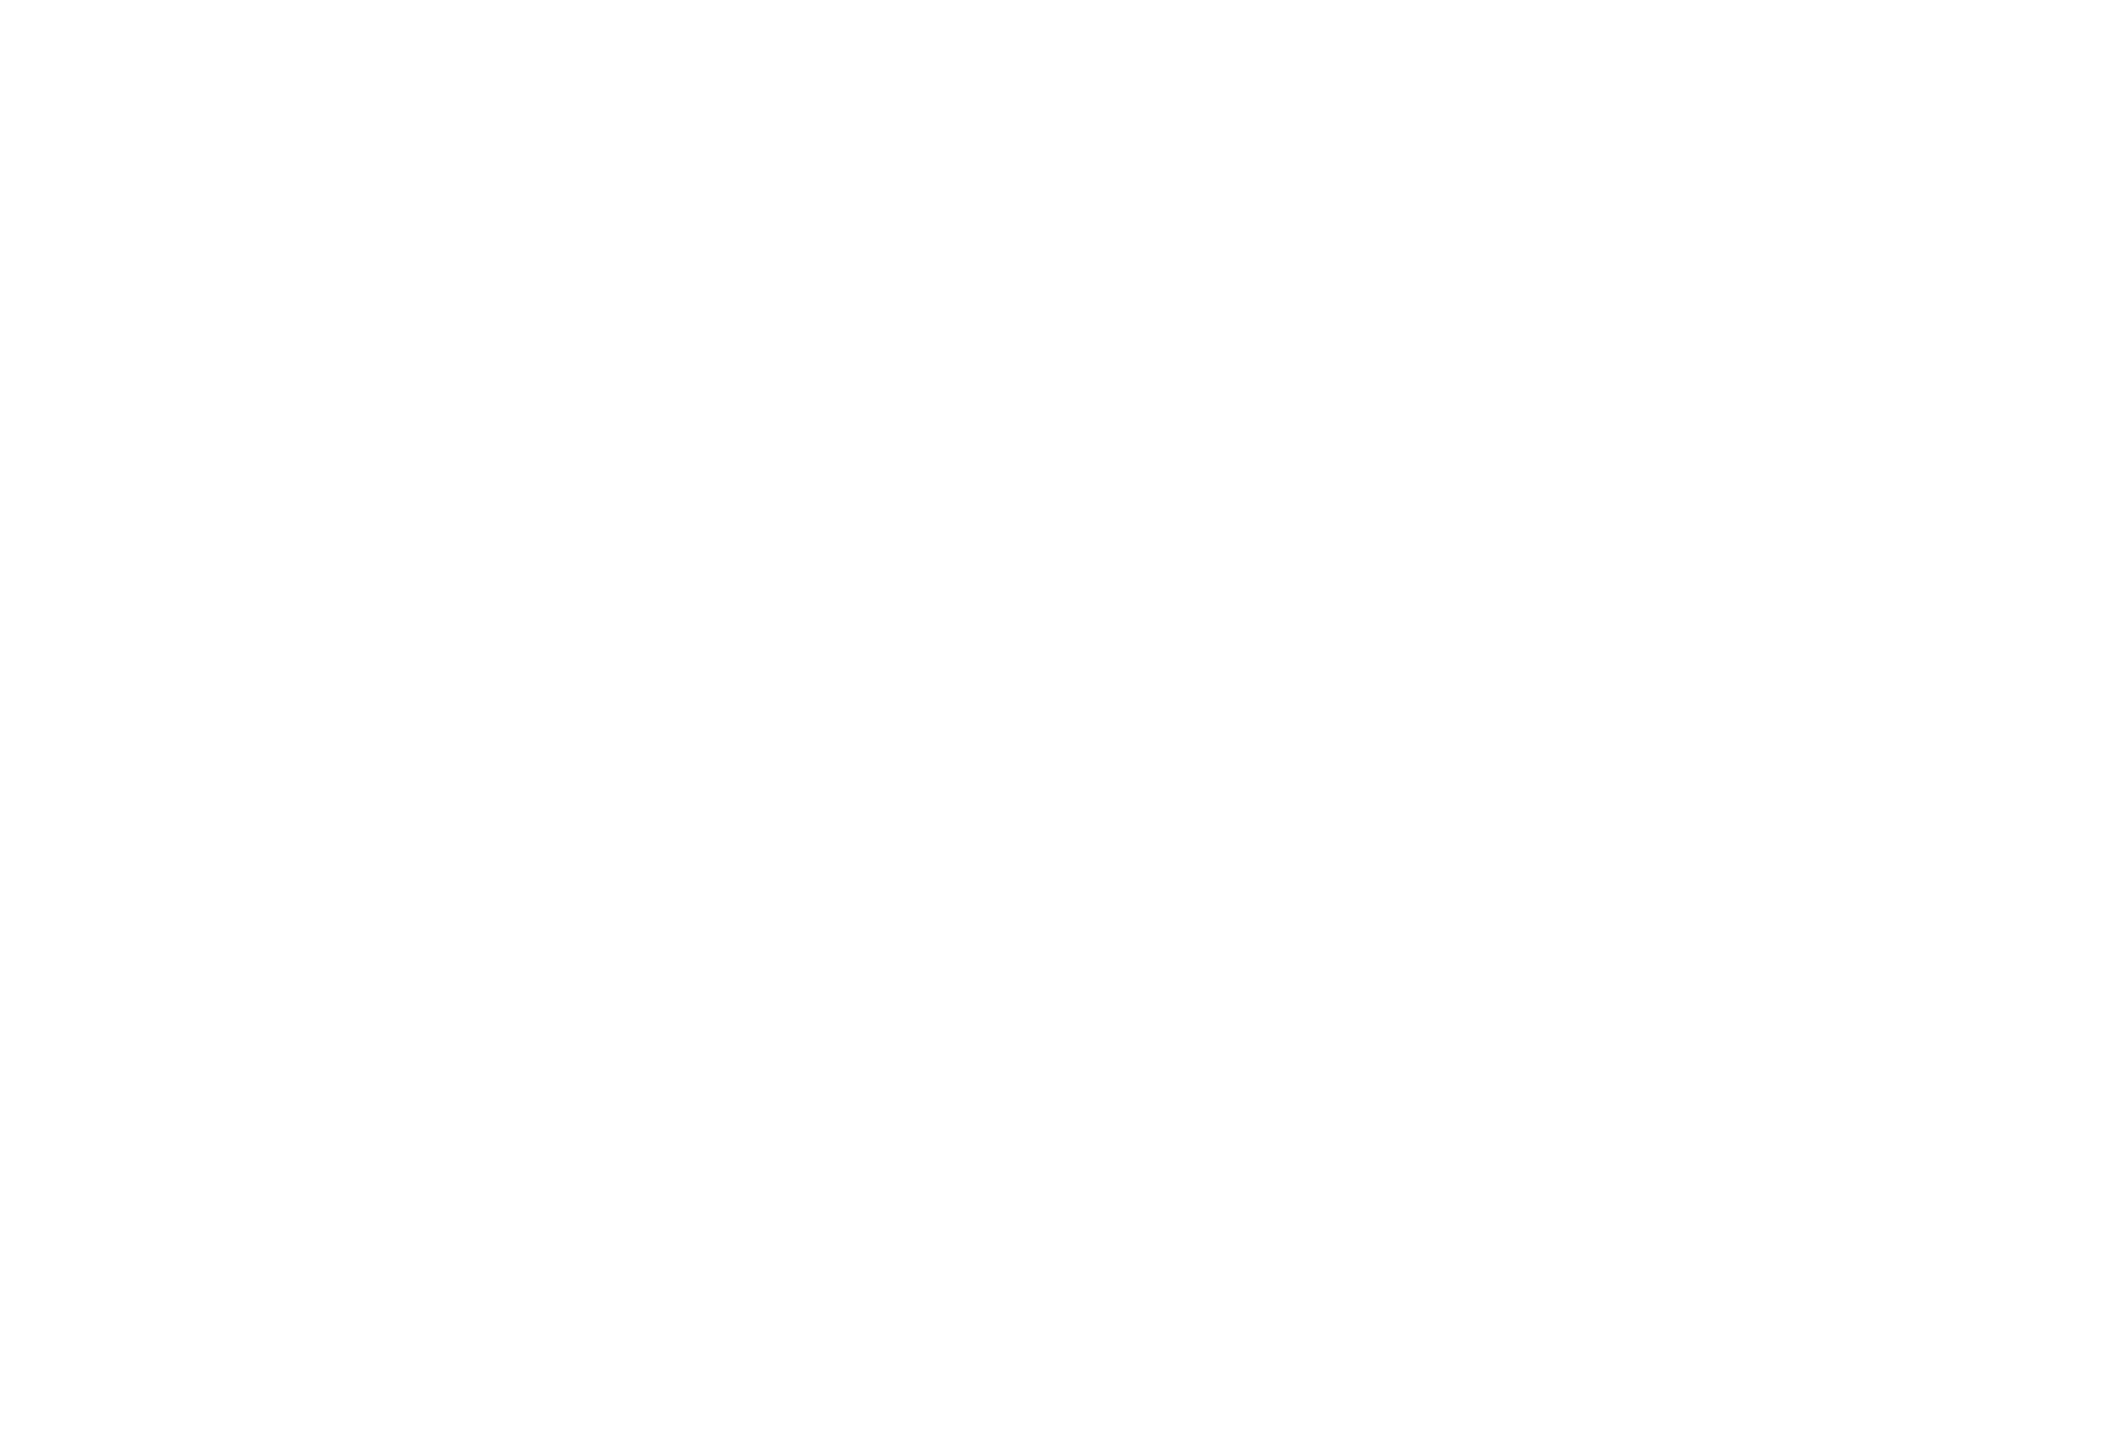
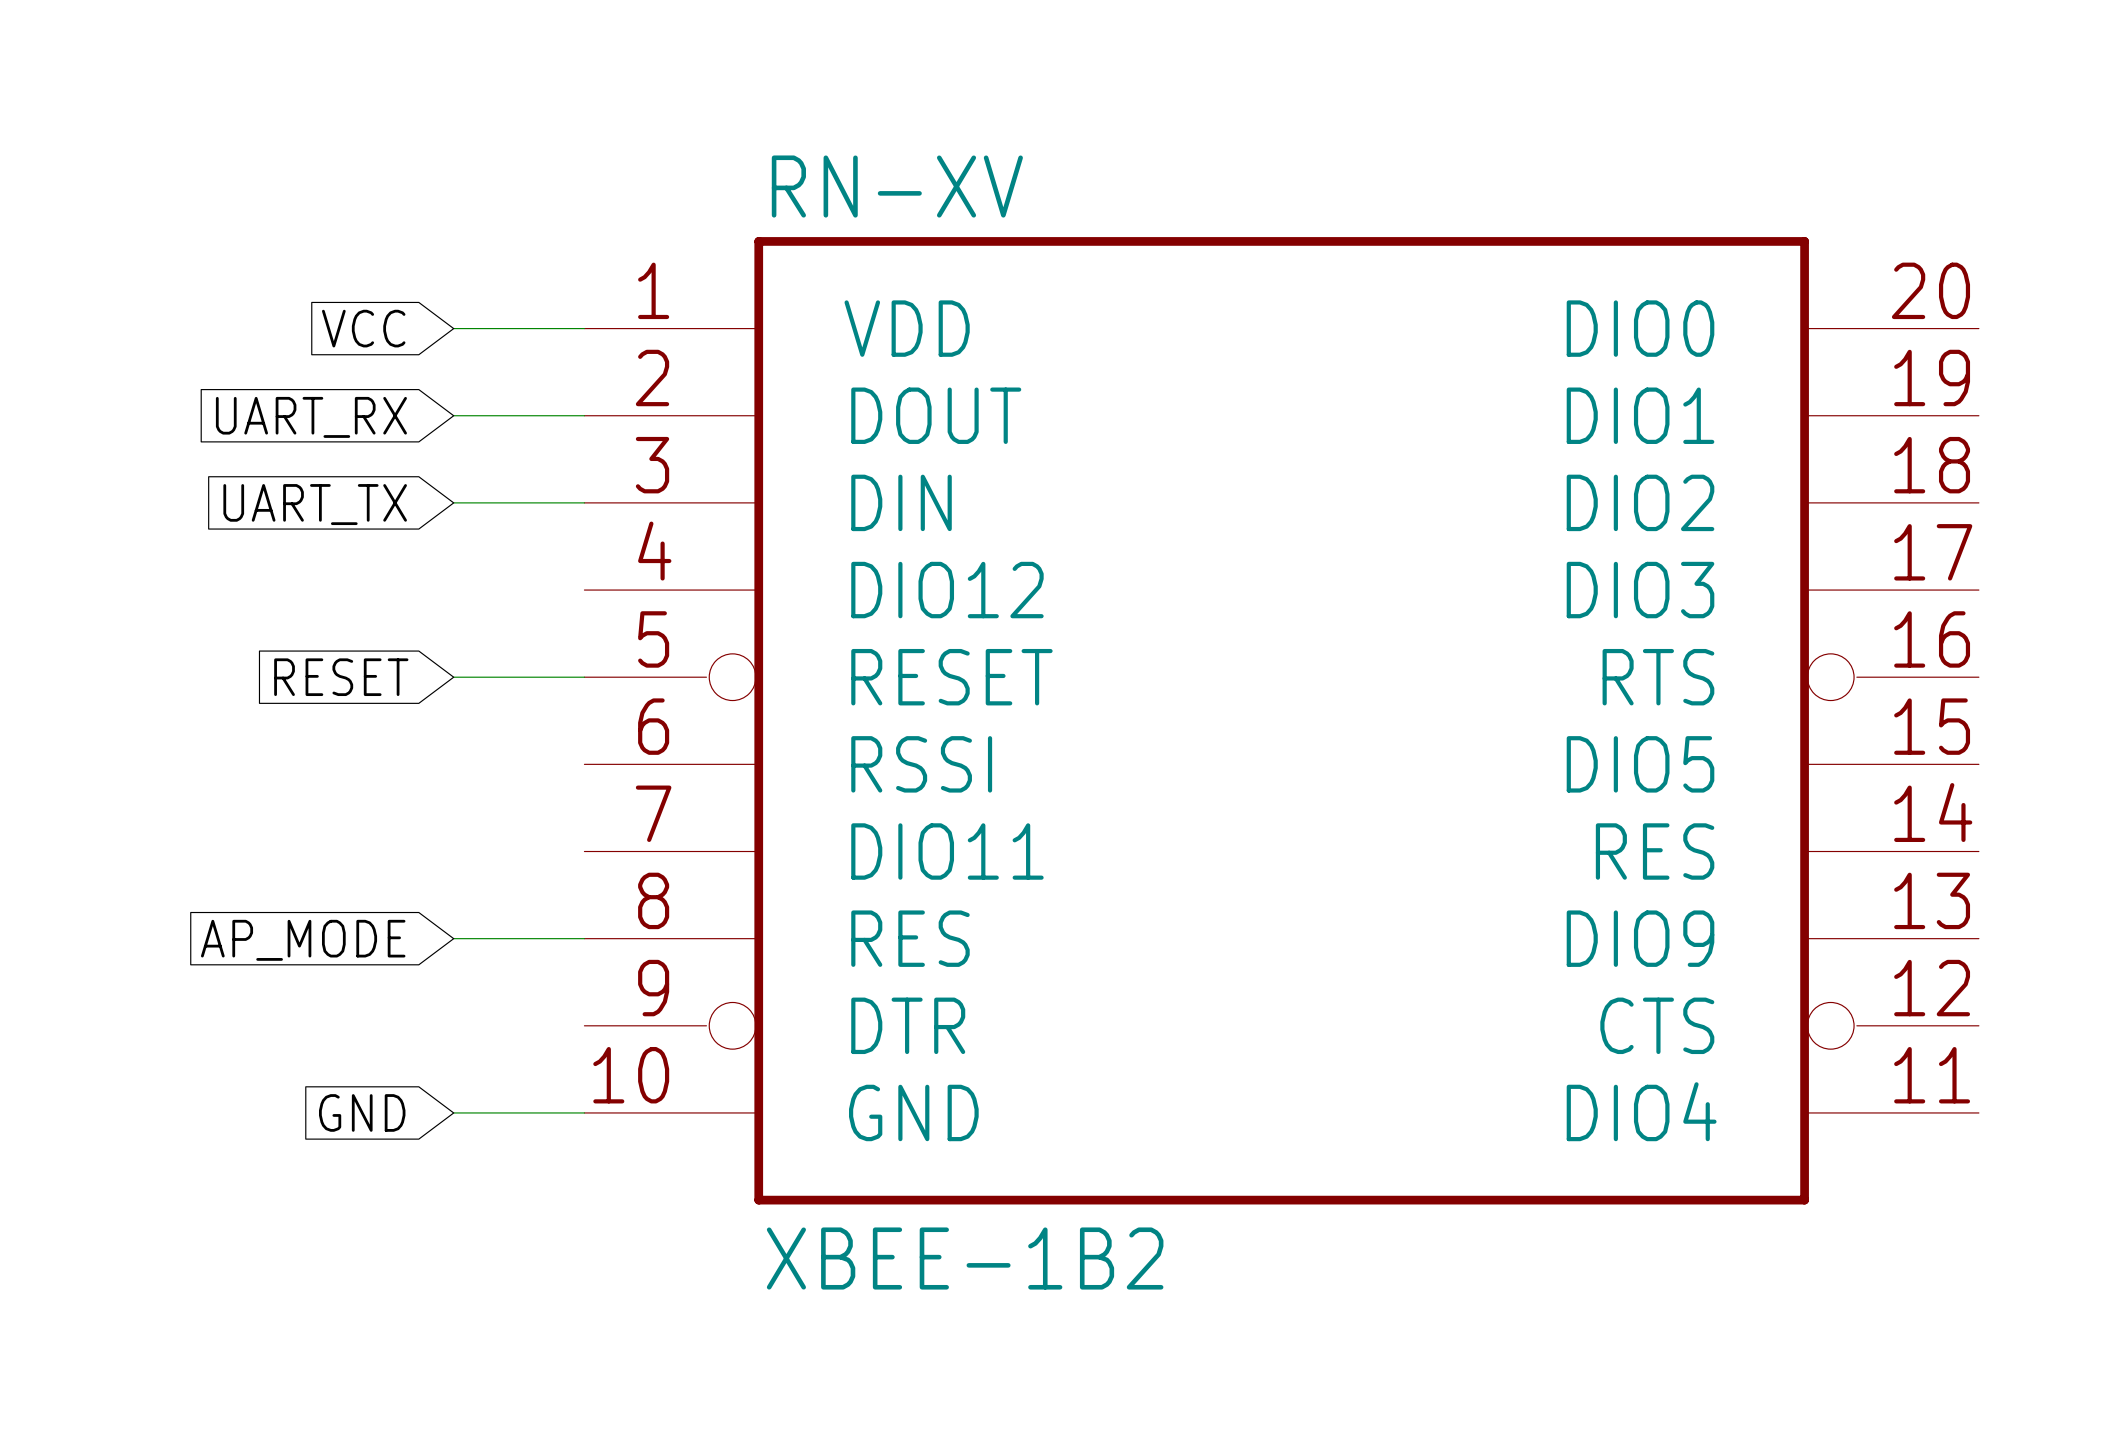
global label: none -> VCC (363, 328)
wire: none -> (453, 328) (584, 328)
wire: none -> (453, 415) (584, 415)
global label: none -> UART_RX (311, 417)
wire: none -> (453, 502) (584, 502)
global label: none -> UART_TX (315, 504)
global label: none -> RESET (341, 677)
wire: none -> (453, 677) (584, 677)
RN-XV: none -> XBEE-1B2 (1281, 720)
wire: none -> (453, 938) (584, 938)
global label: none -> AP_MODE (303, 940)
global label: none -> GND (362, 1112)
wire: none -> (453, 1112) (584, 1112)

